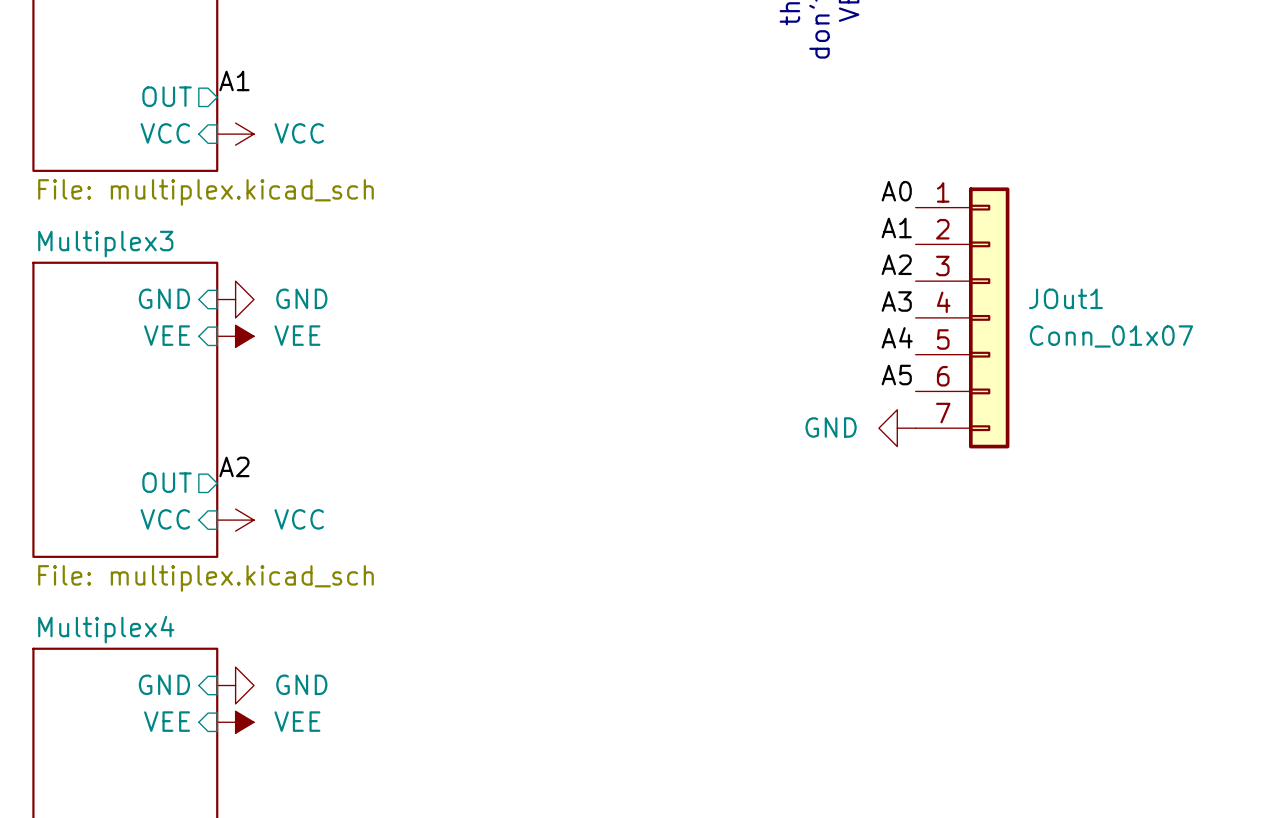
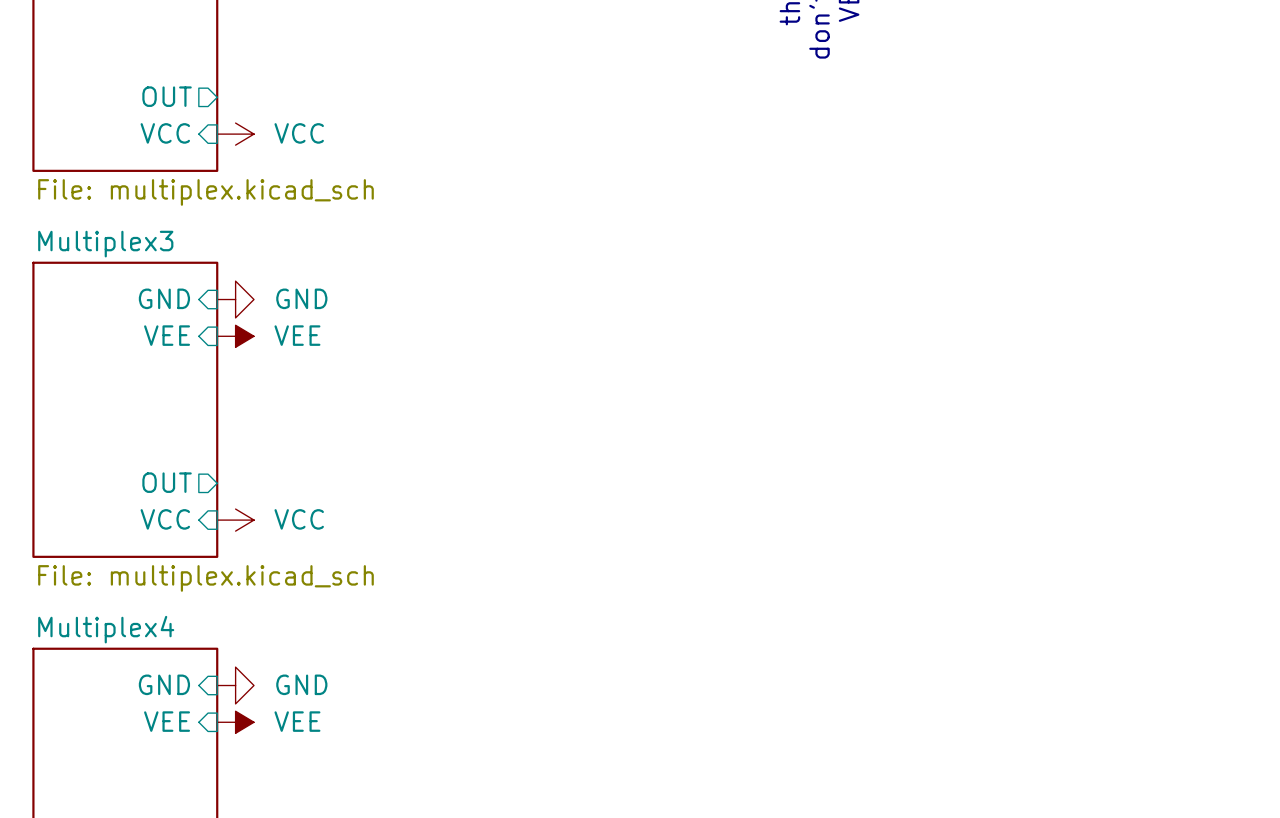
label: A1 (234, 80) -> none
label: A0 (896, 191) -> none
label: A1 (896, 227) -> none
label: A2 (896, 264) -> none
label: A3 (896, 301) -> none
JOut1: Conn_01x07 (962, 317) -> none
label: A4 (897, 337) -> none
label: A5 (896, 375) -> none
power symbol: GND (897, 428) -> none
label: A2 (234, 466) -> none

